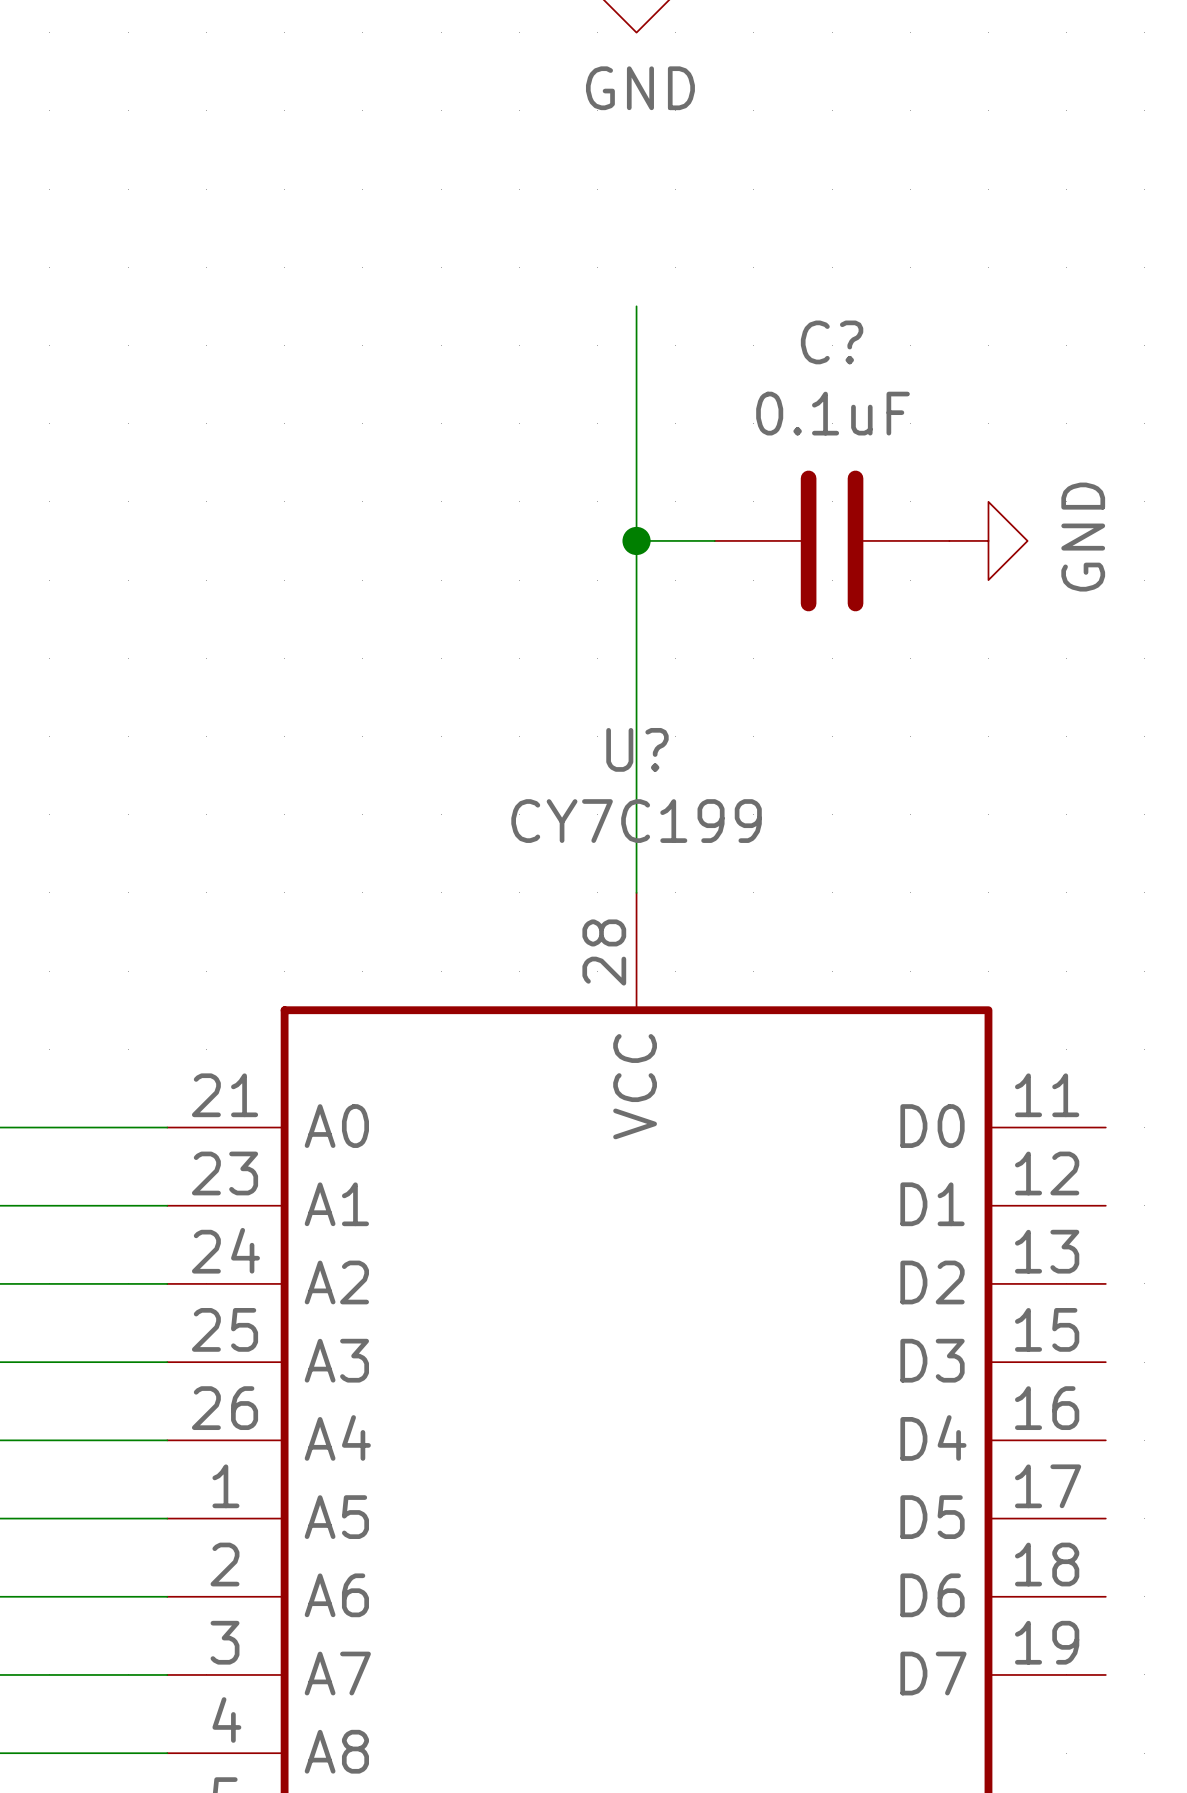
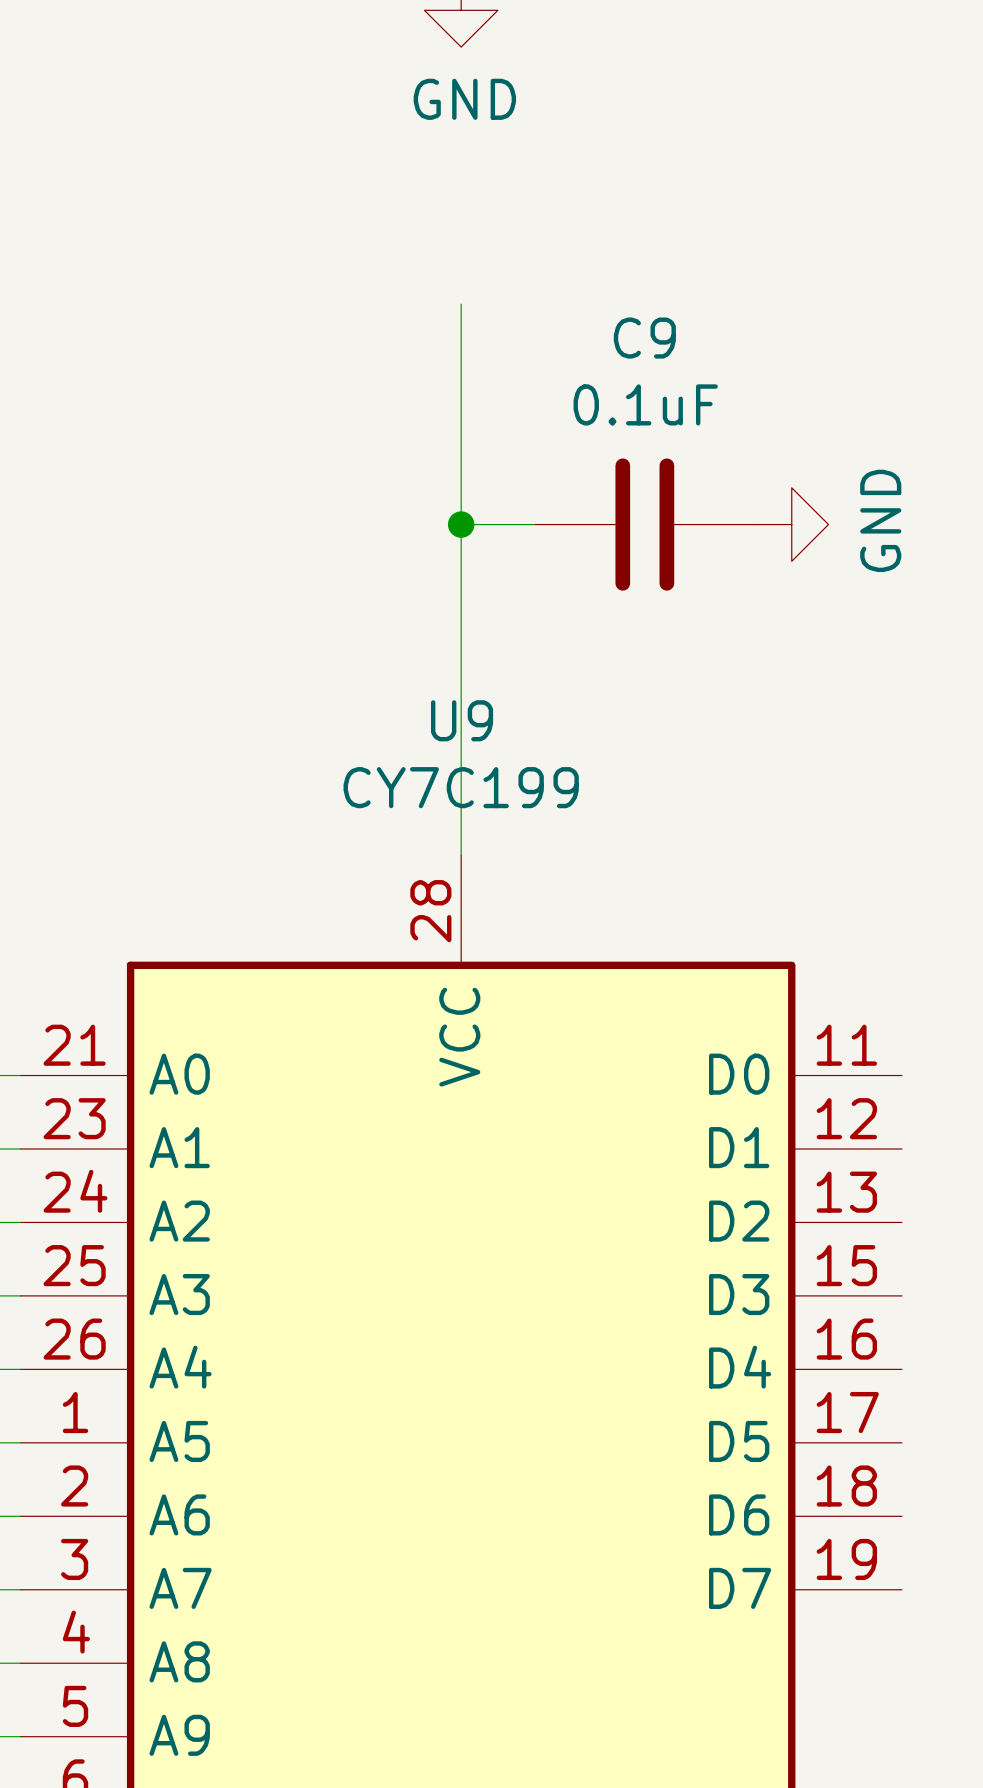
C? name: C? (832, 342) -> C9 (644, 338)
U? name: U? (637, 749) -> U9 (462, 720)

